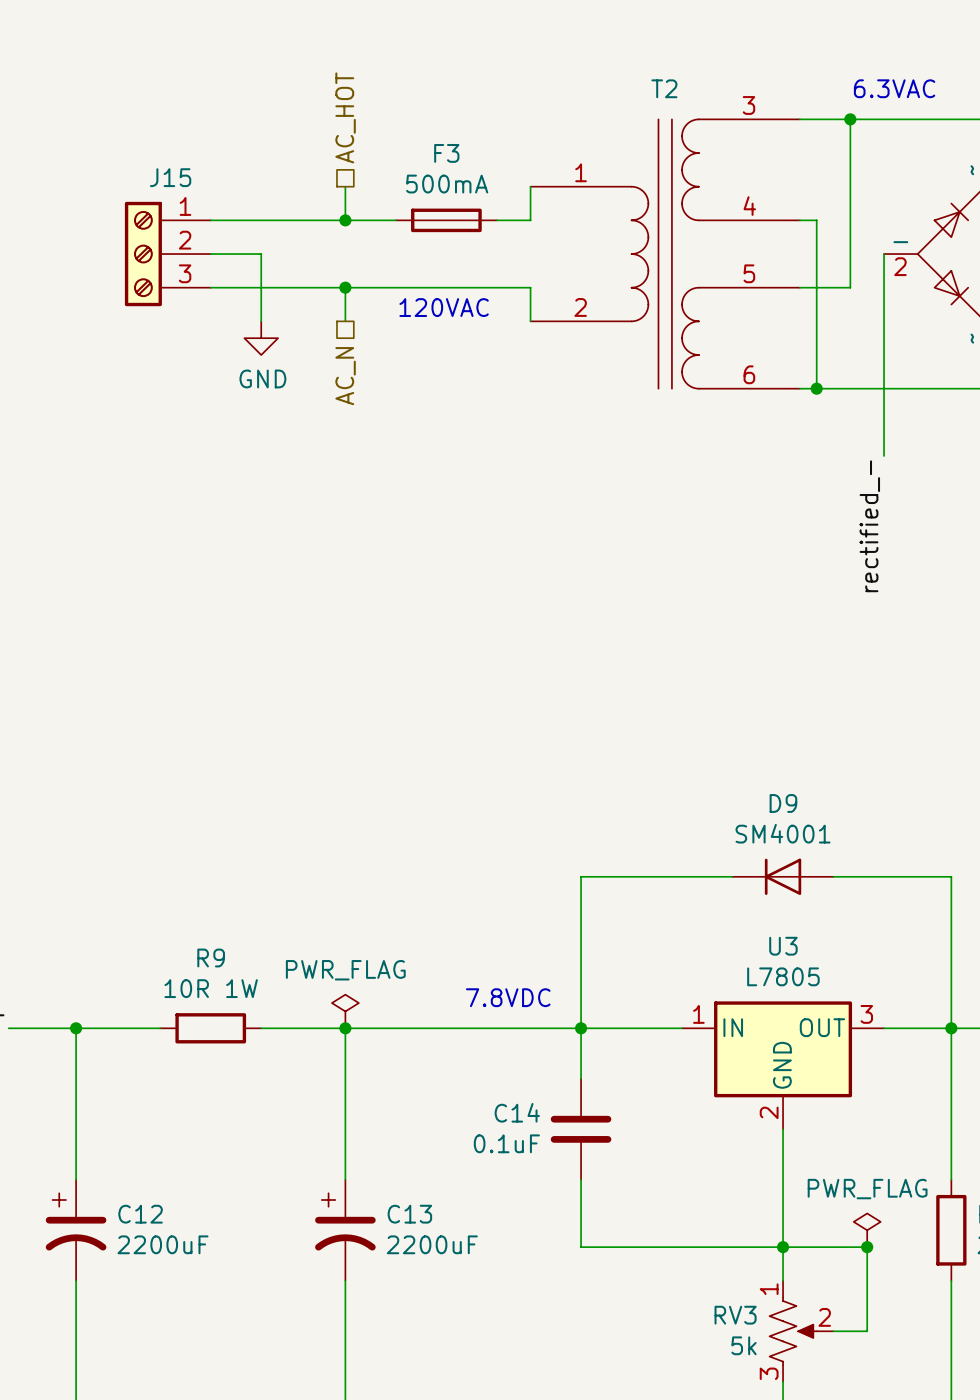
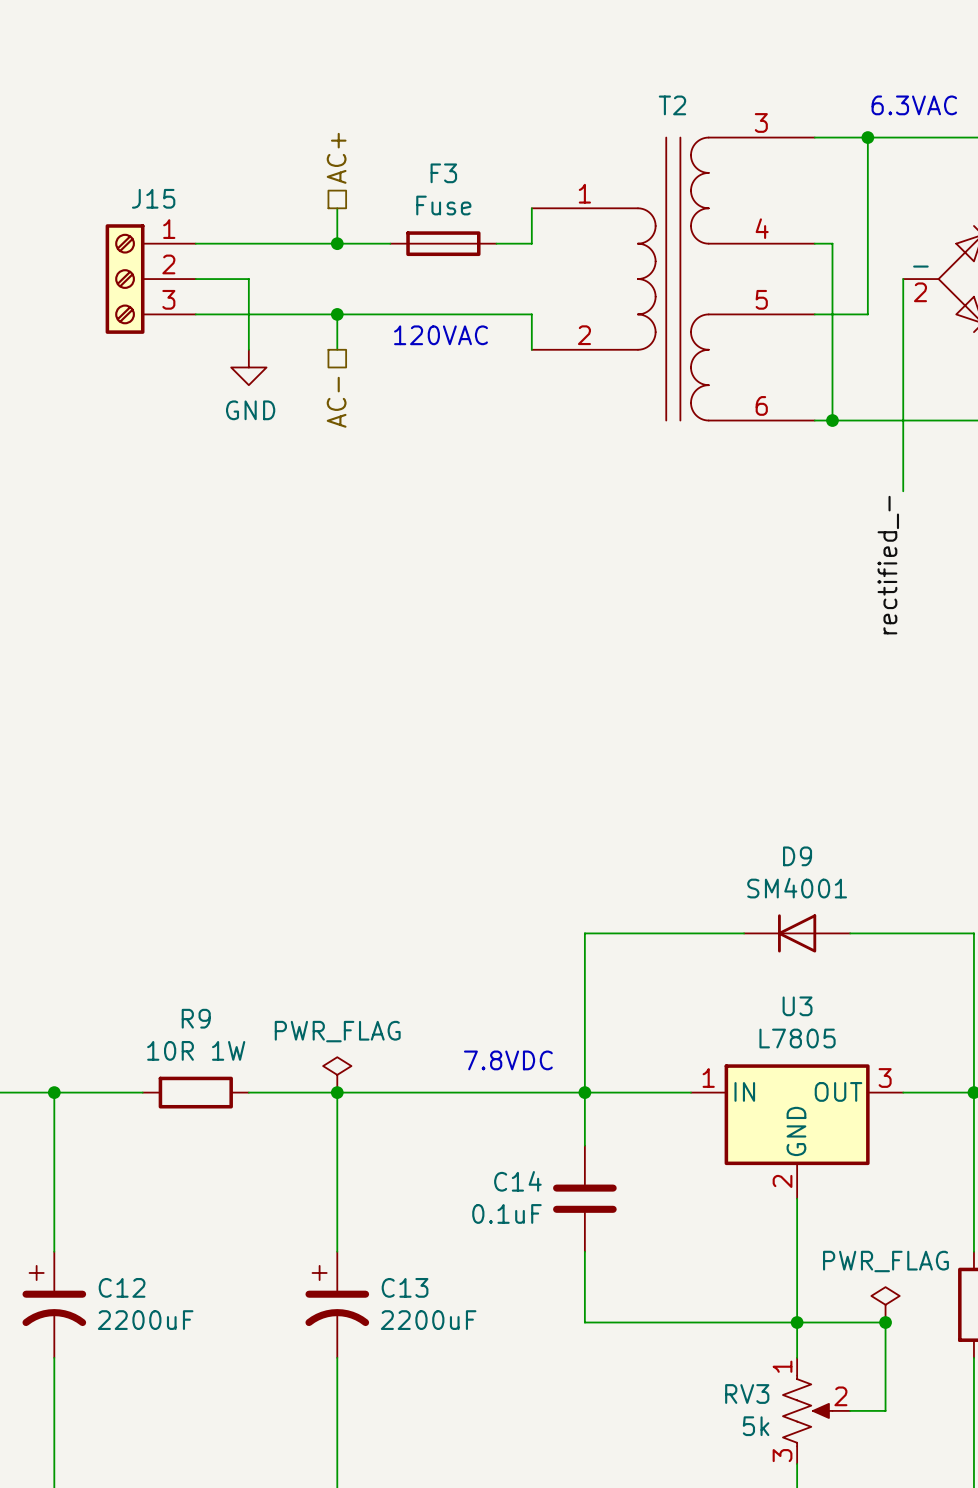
hierarchical label: AC_HOT (345, 117) -> AC+ (336, 158)
F3 value: 500mA (447, 184) -> Fuse (443, 205)
hierarchical label: AC_N (345, 376) -> AC- (336, 402)

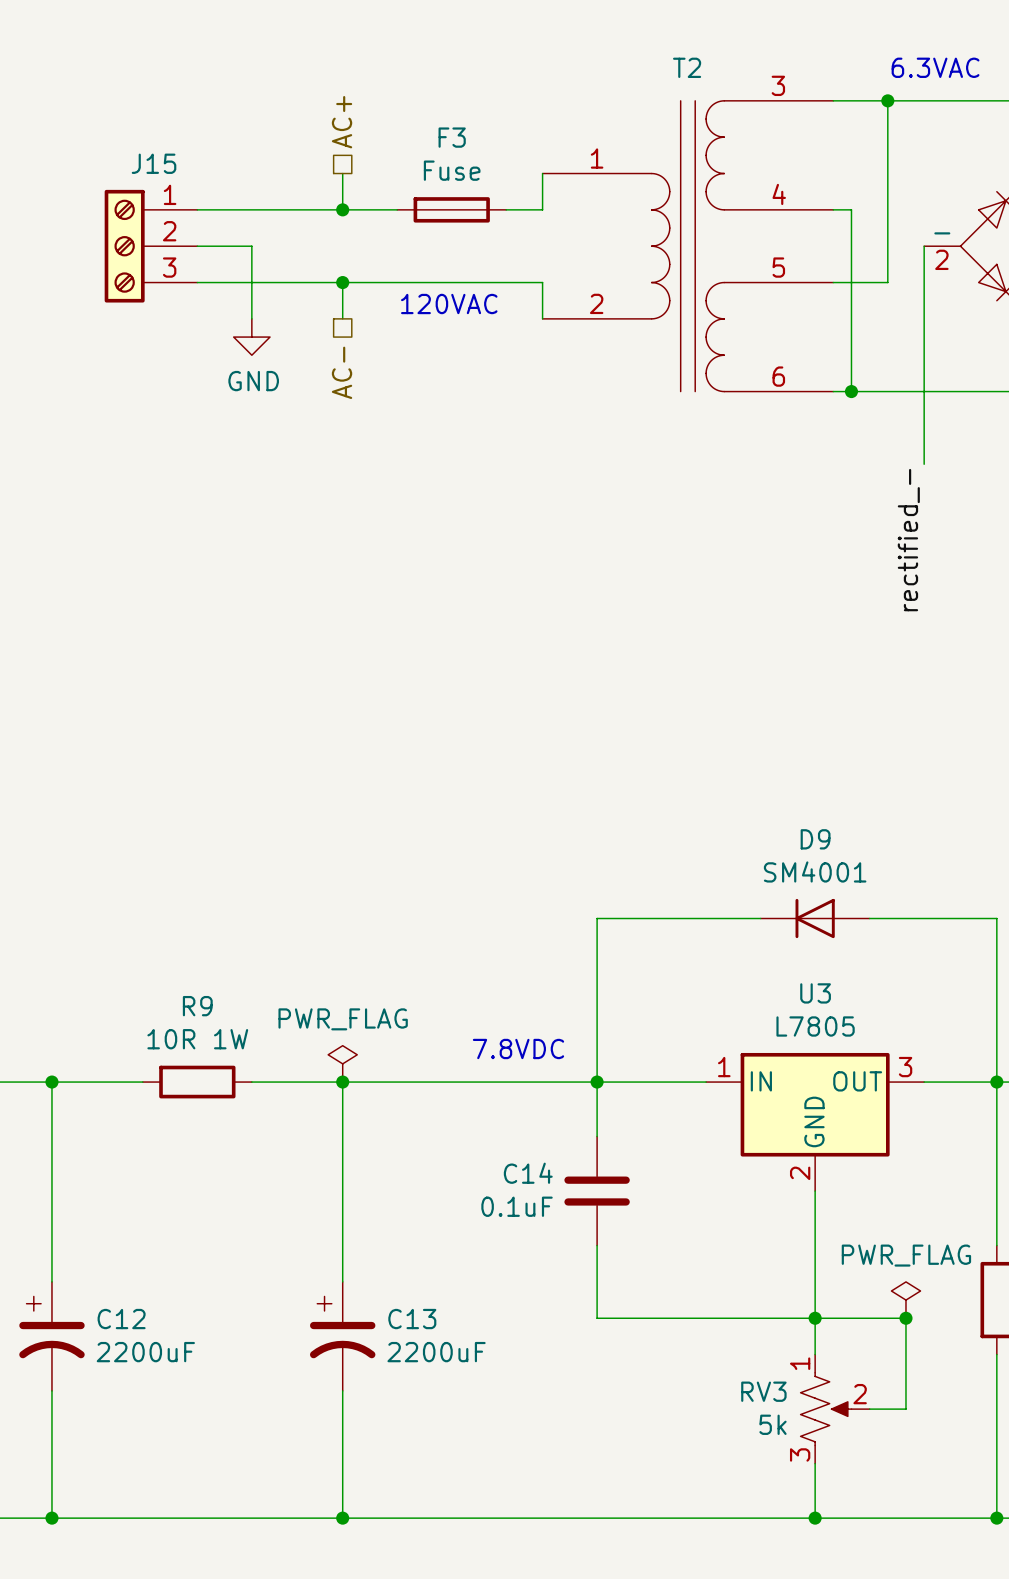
C12 position: (54, 1304) -> (51, 1336)
C13 position: (337, 1304) -> (342, 1336)

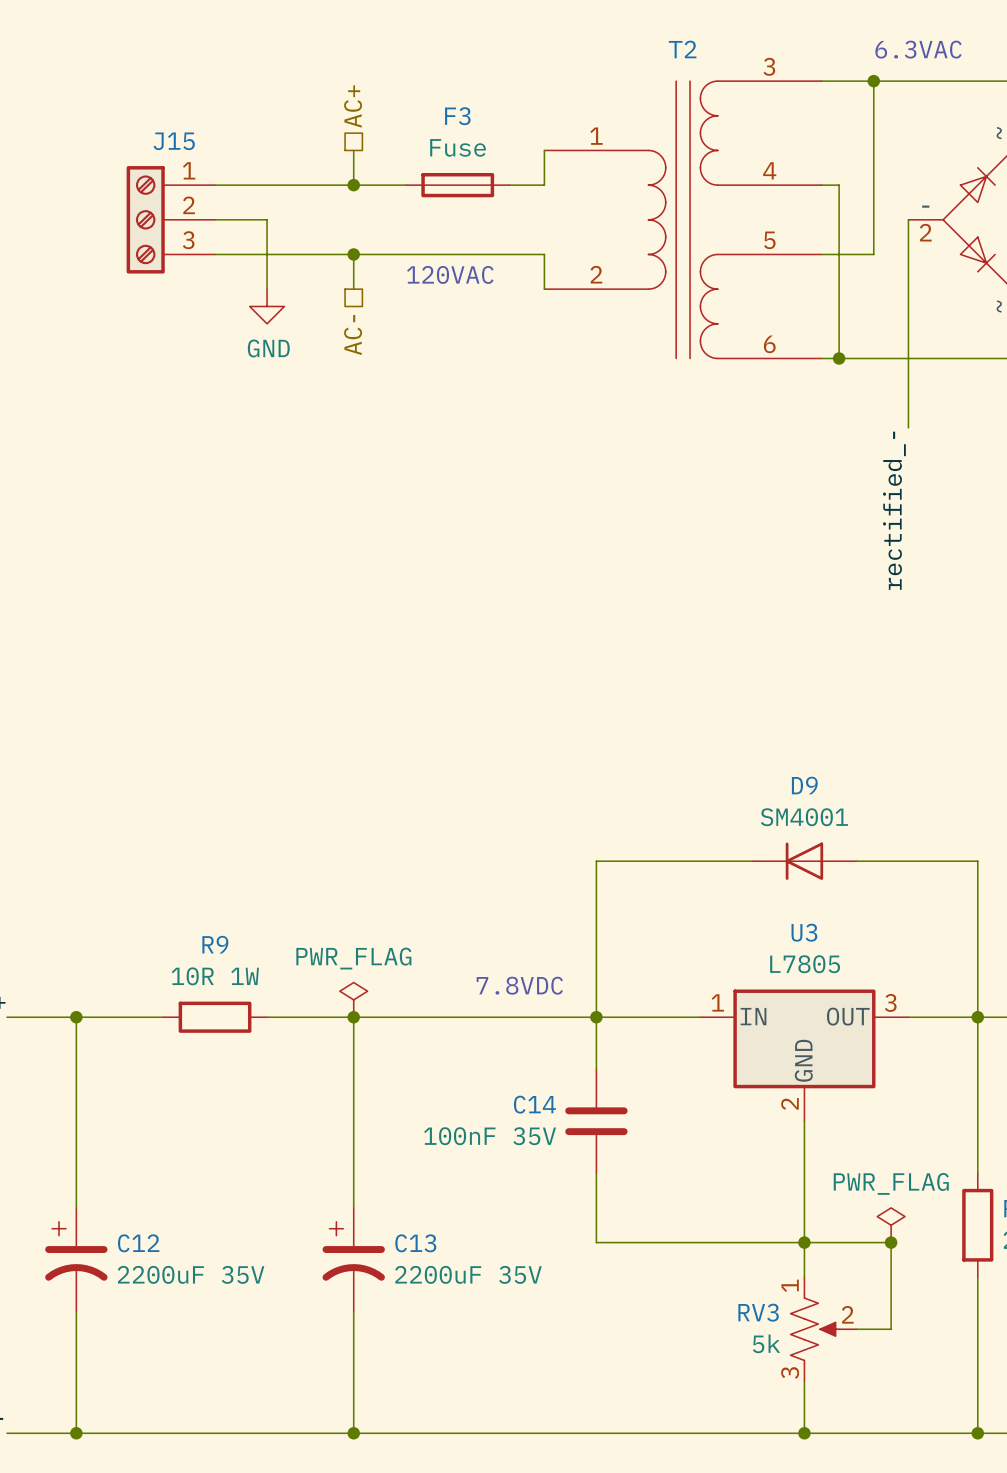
C14 value: 0.1uF (517, 1206) -> 100nF 35V (490, 1136)
C12 value: 2200uF (145, 1352) -> 2200uF 35V (191, 1274)
C13 value: 2200uF (436, 1352) -> 2200uF 35V (468, 1274)

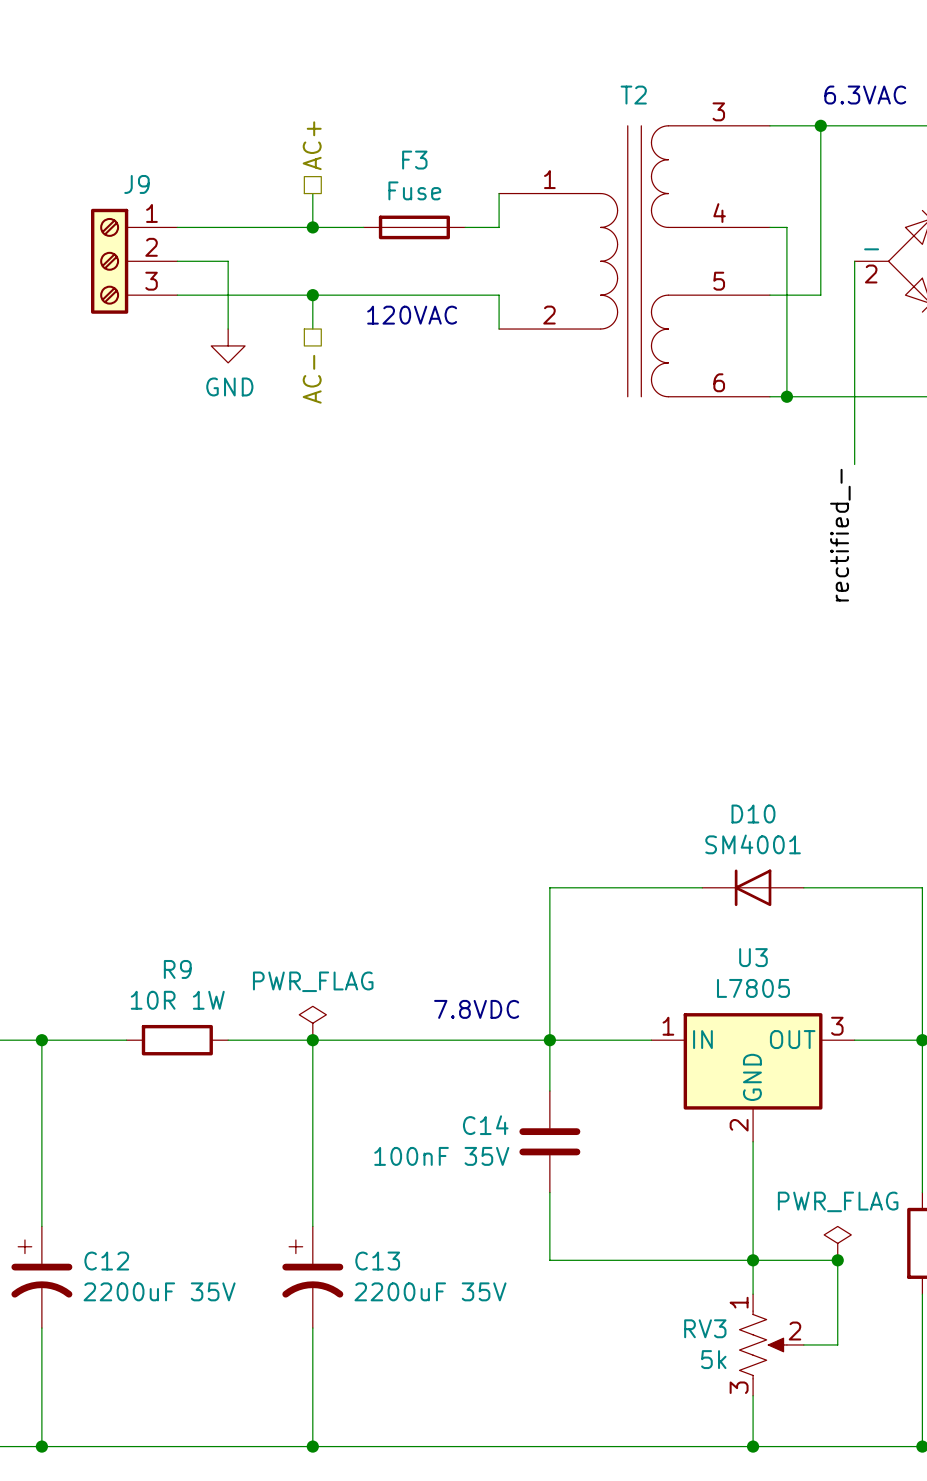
J15 name: J15 (174, 141) -> J9 (136, 184)
D9 name: D9 (804, 785) -> D10 (753, 814)

